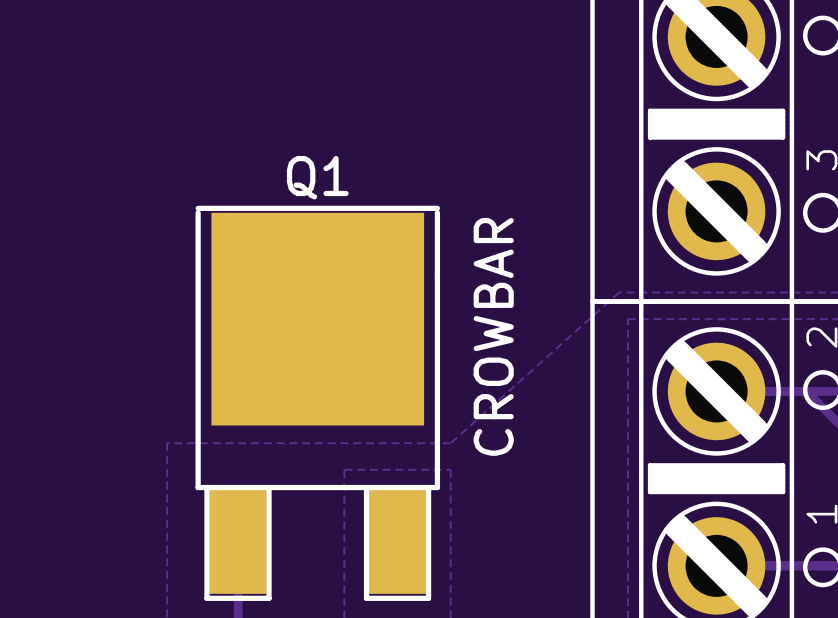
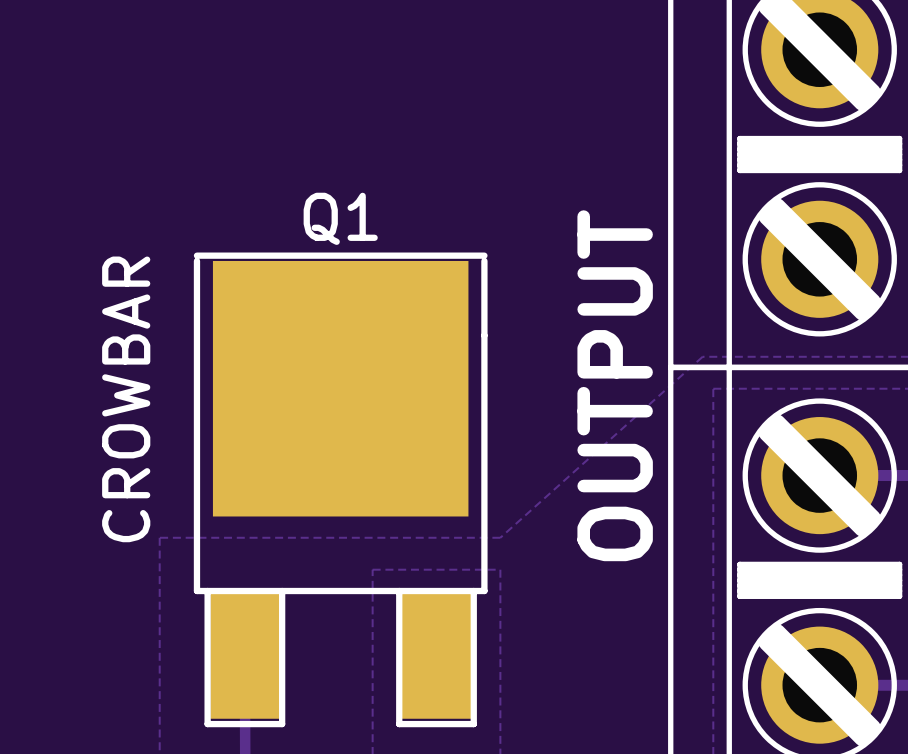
text: none -> OUTPUT (615, 385)
Q1 value position: CROWBAR (493, 336) -> CROWBAR (126, 399)

